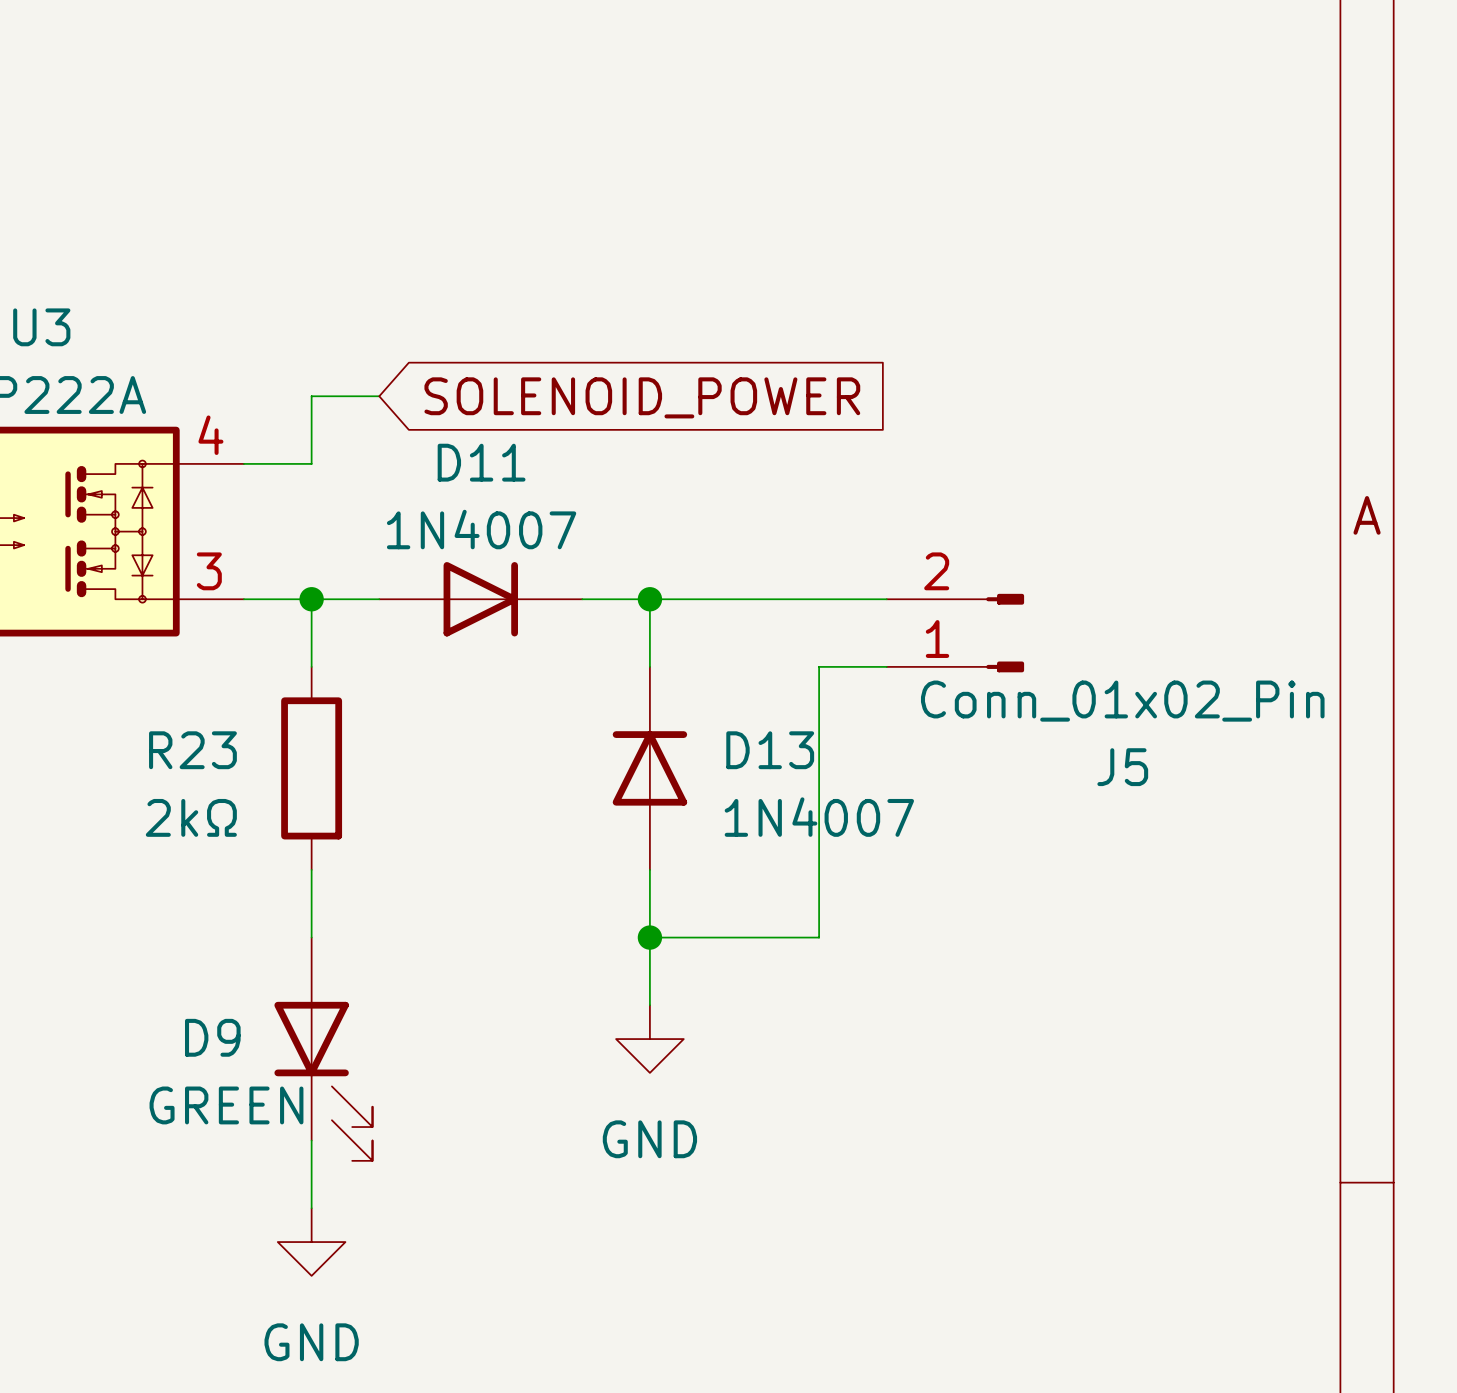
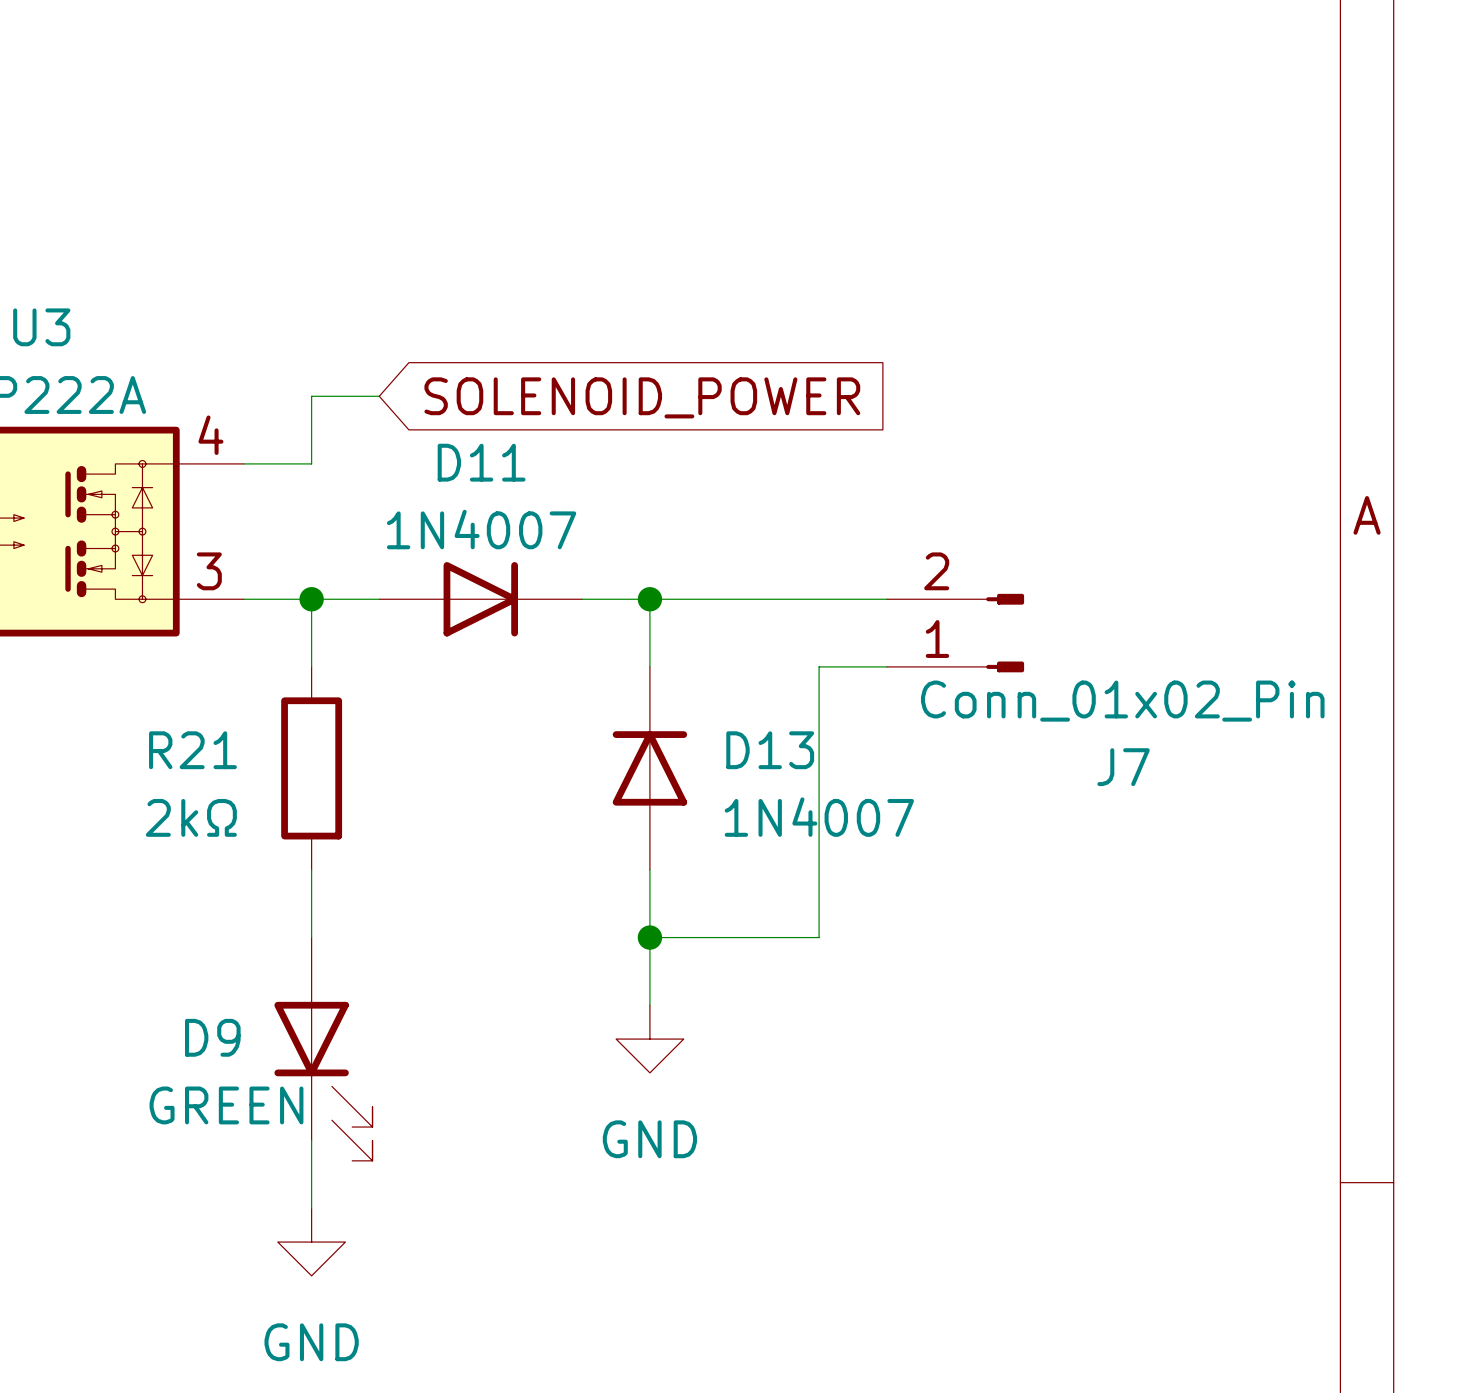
R23 name: R23 (192, 750) -> R21 (192, 750)
J5 name: J5 (1122, 767) -> J7 (1123, 767)

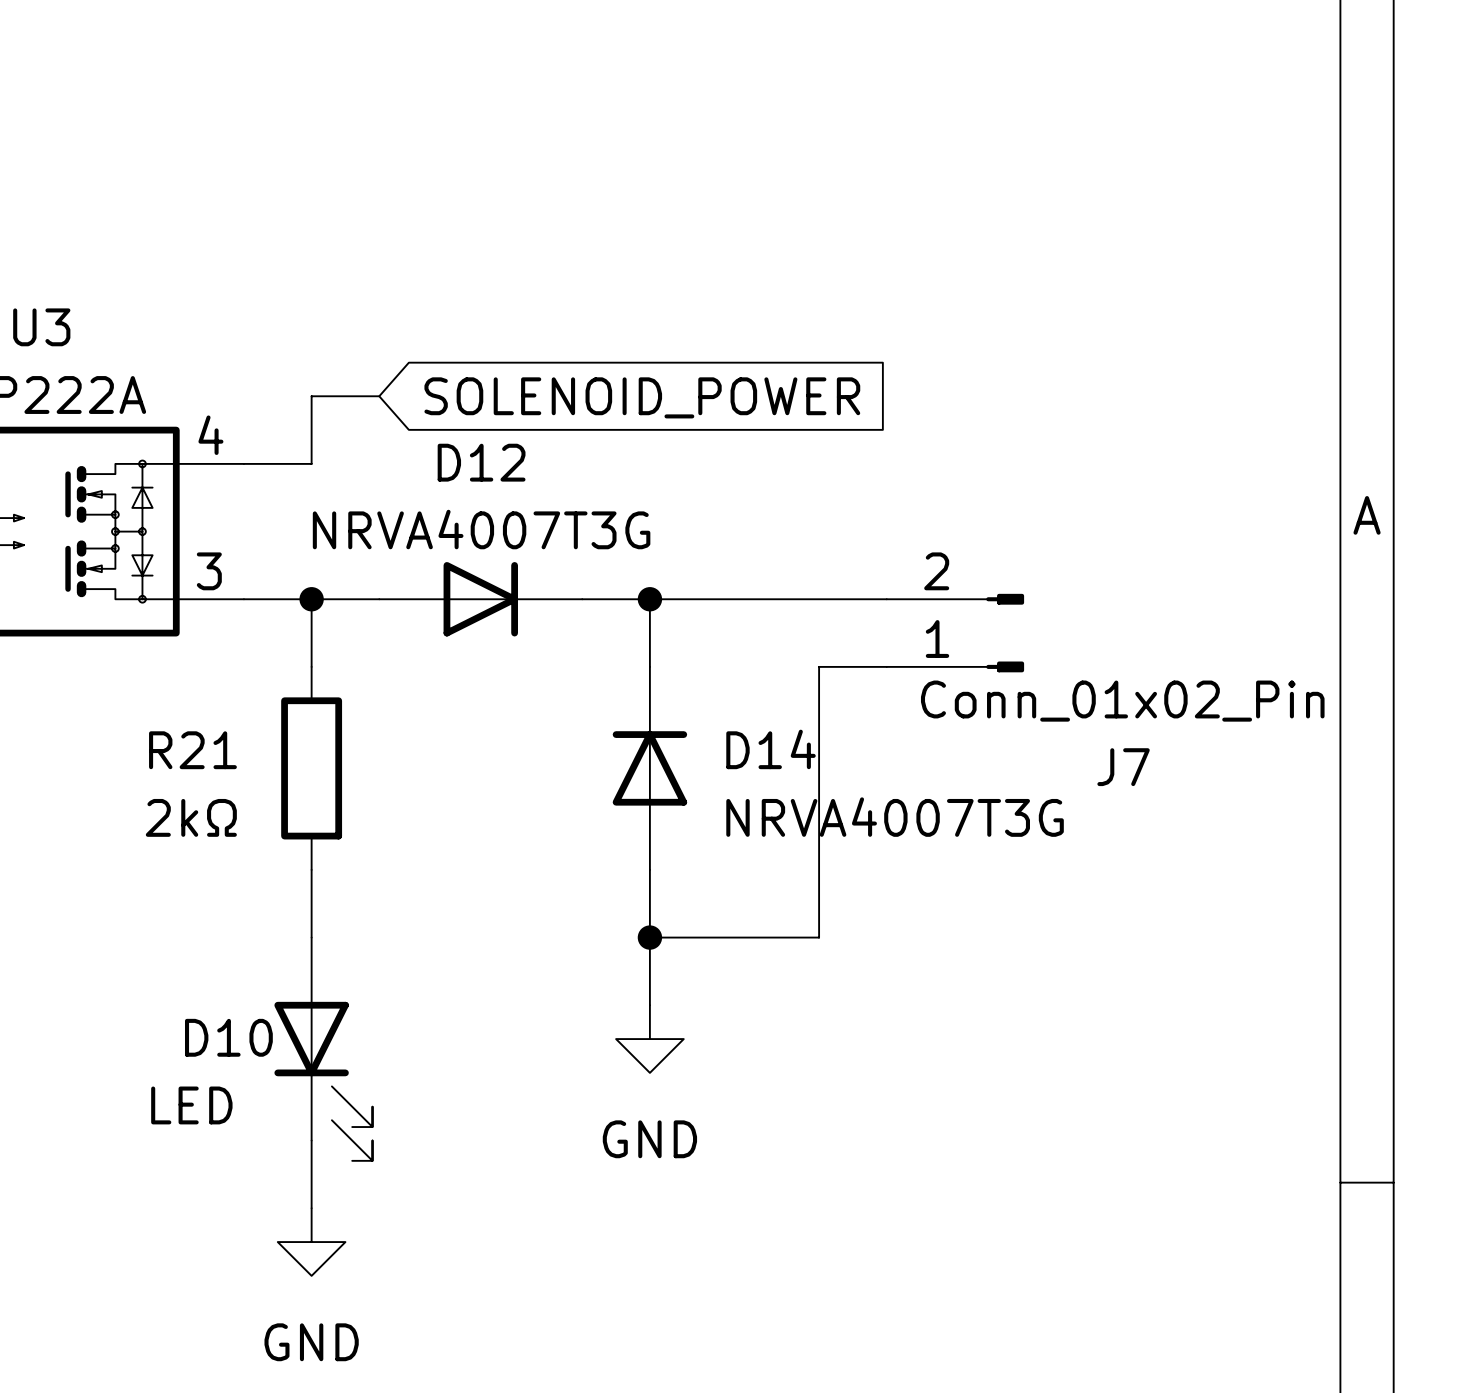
D11 name: D11 (481, 462) -> D12 (481, 462)
D11 value: 1N4007 (481, 529) -> NRVA4007T3G (481, 529)
D13 name: D13 (770, 750) -> D14 (771, 749)
D13 value: 1N4007 (819, 817) -> NRVA4007T3G (895, 817)
D9 name: D9 (212, 1037) -> D10 (228, 1037)
D9 value: GREEN (226, 1105) -> LED (191, 1105)

